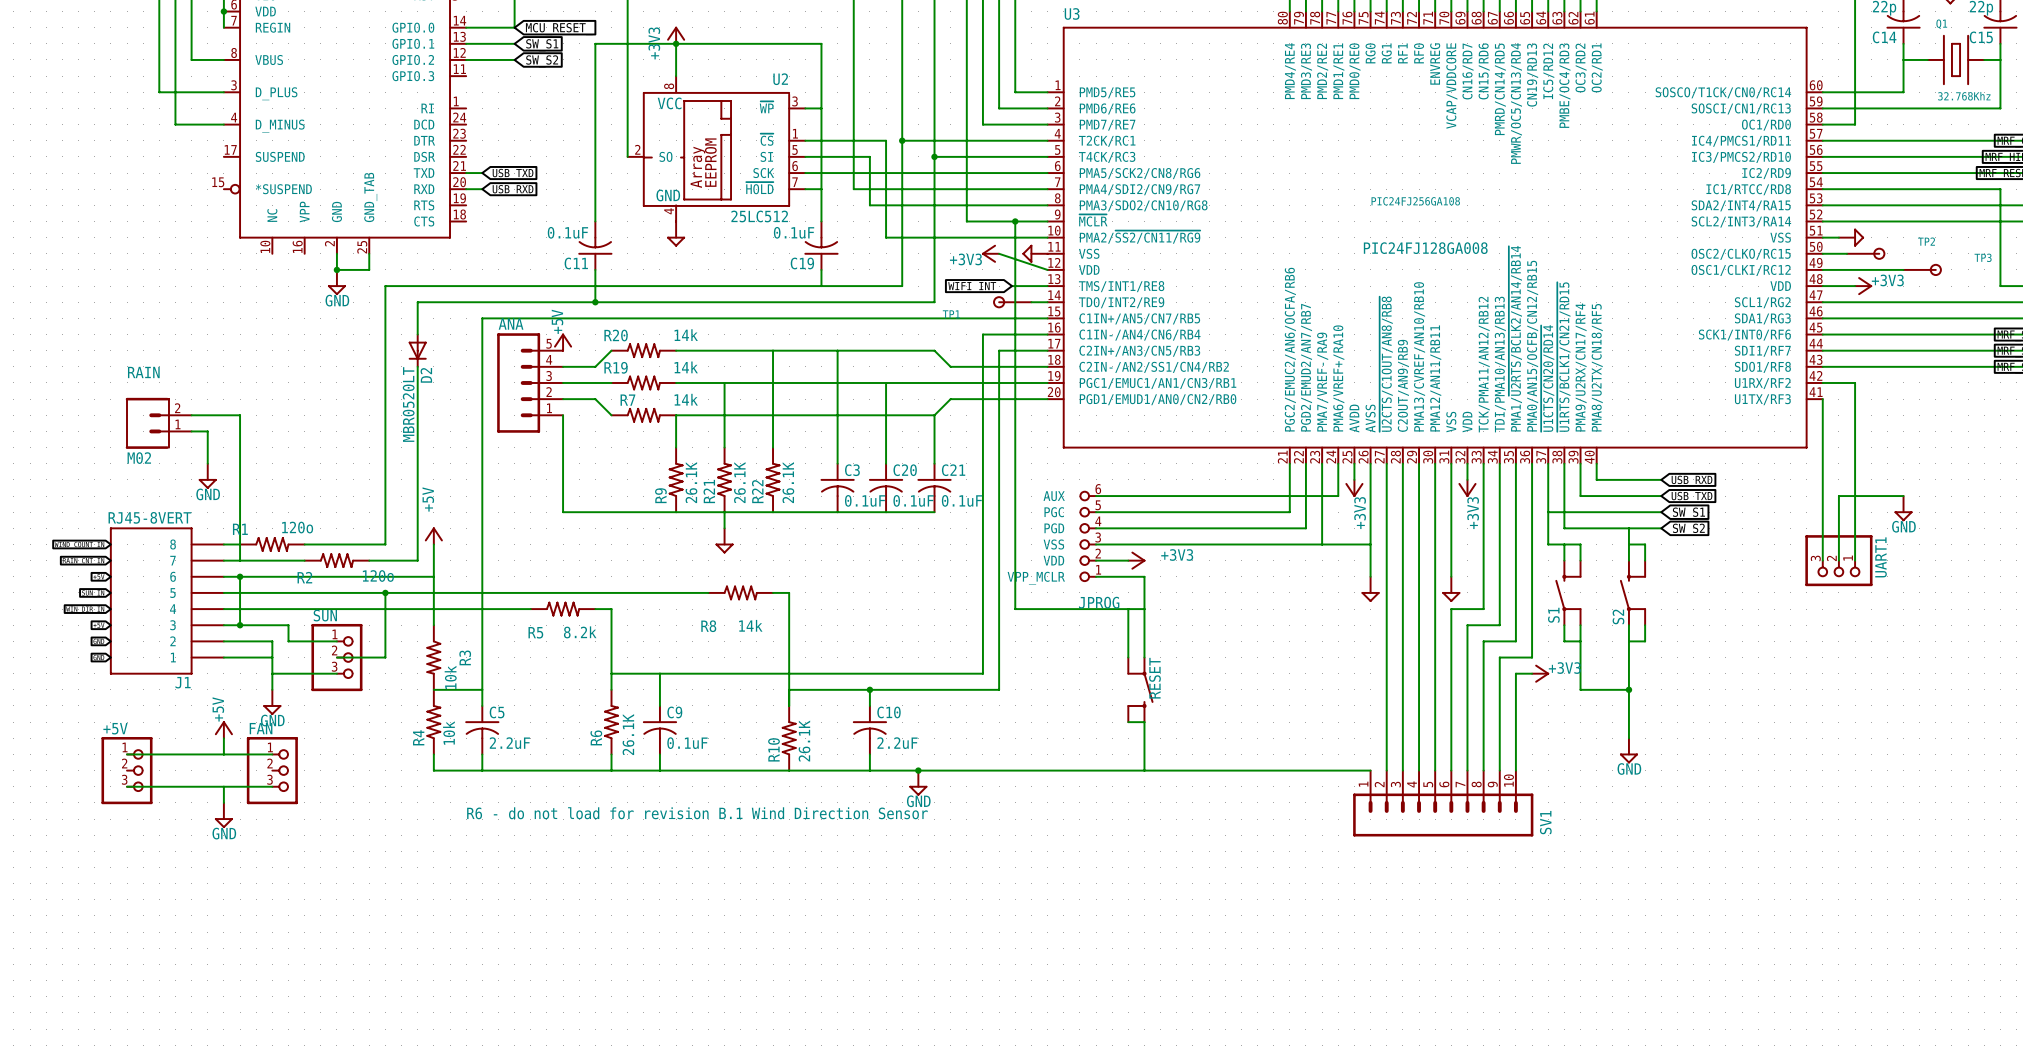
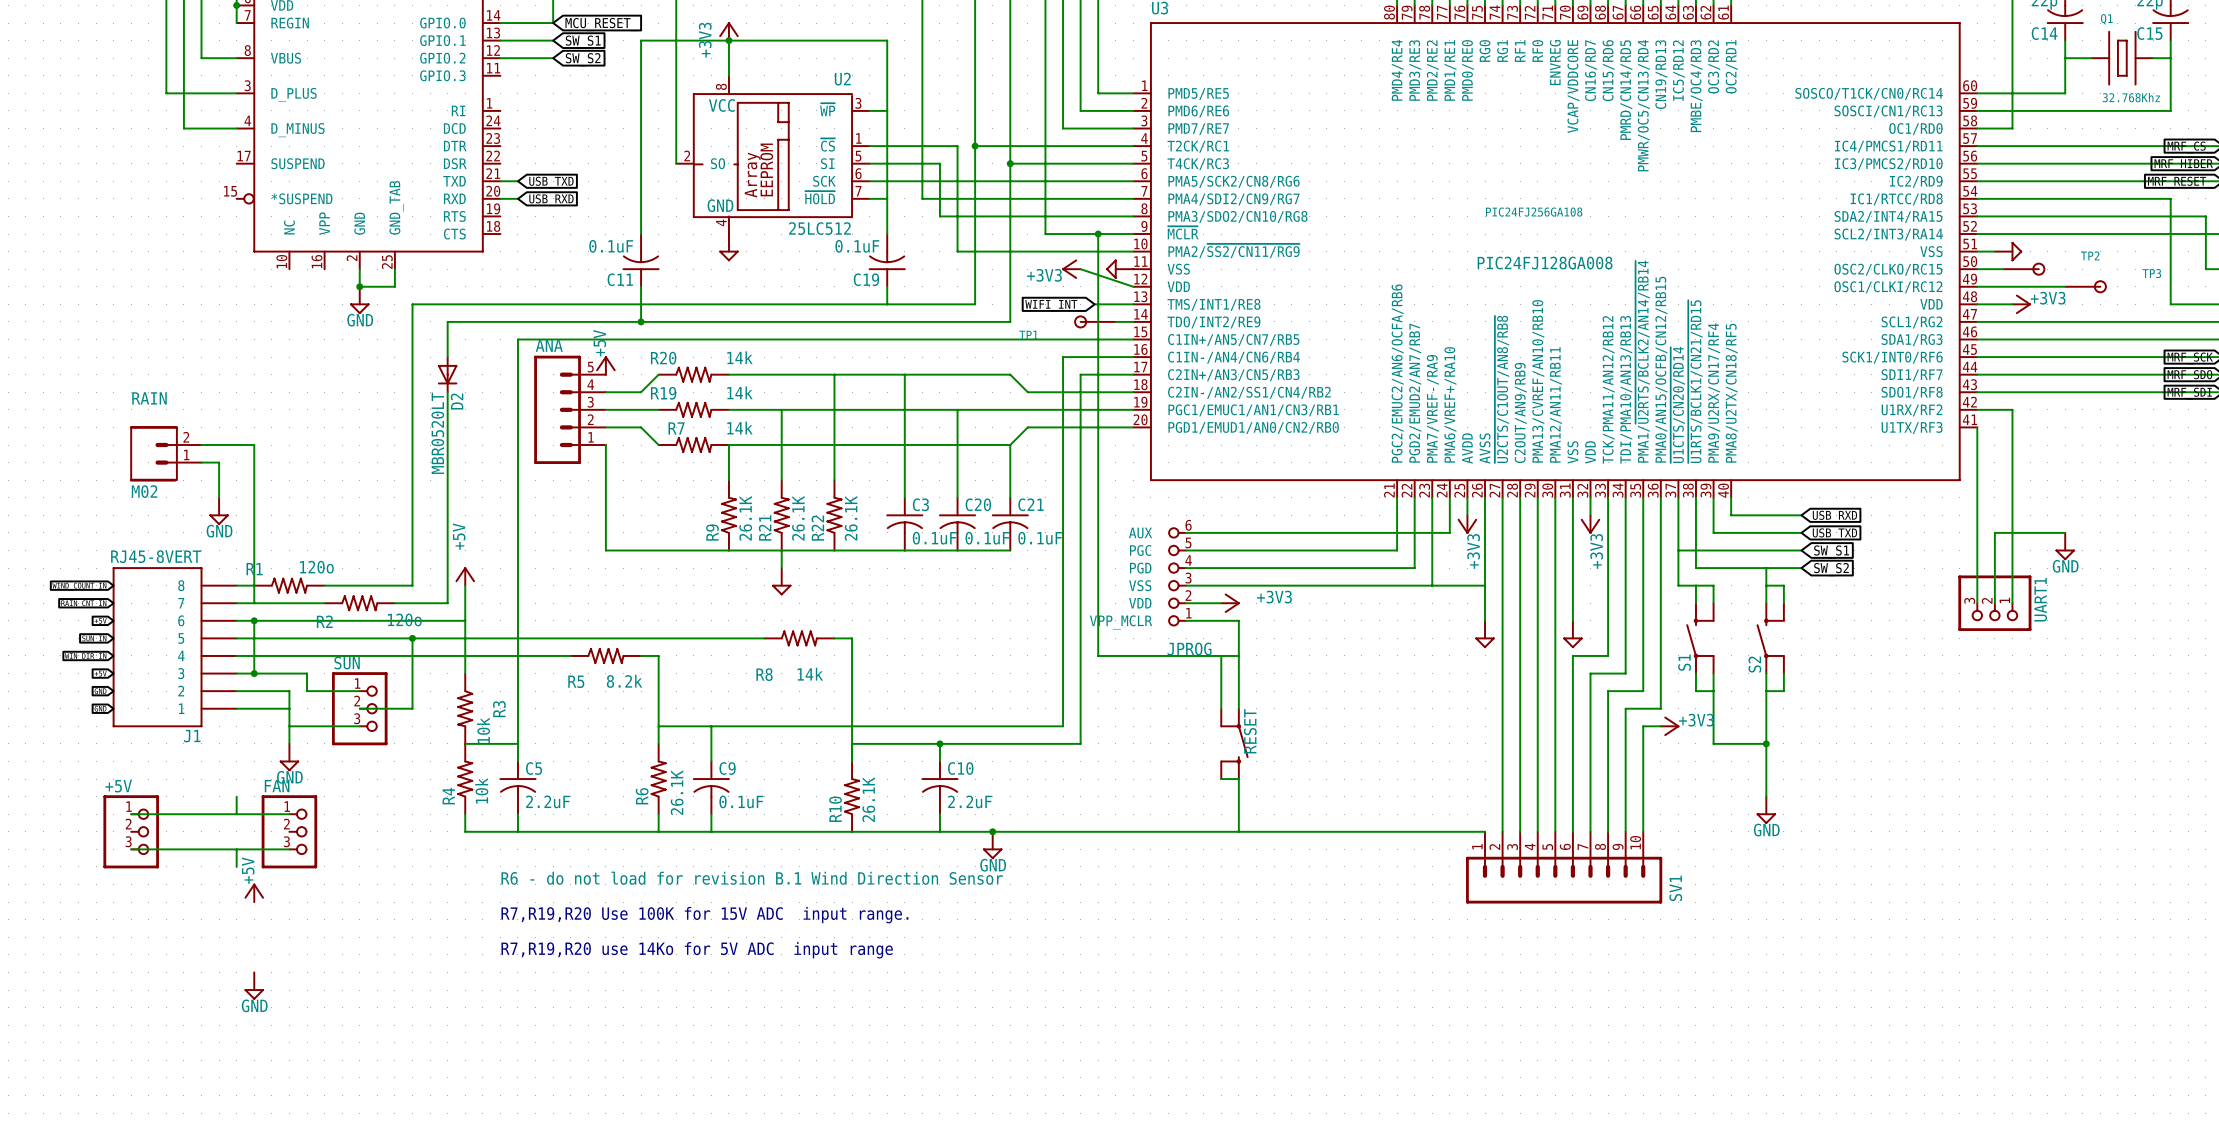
power symbol position: +5V (223, 729) -> +5V (254, 892)
power symbol position: GND (223, 815) -> GND (254, 986)
text: none -> R7,R19,R20 Use 100K for 15V ADC input range. (704, 915)
text: none -> R7,R19,R20 use 14Ko for 5V ADC input range (697, 950)

